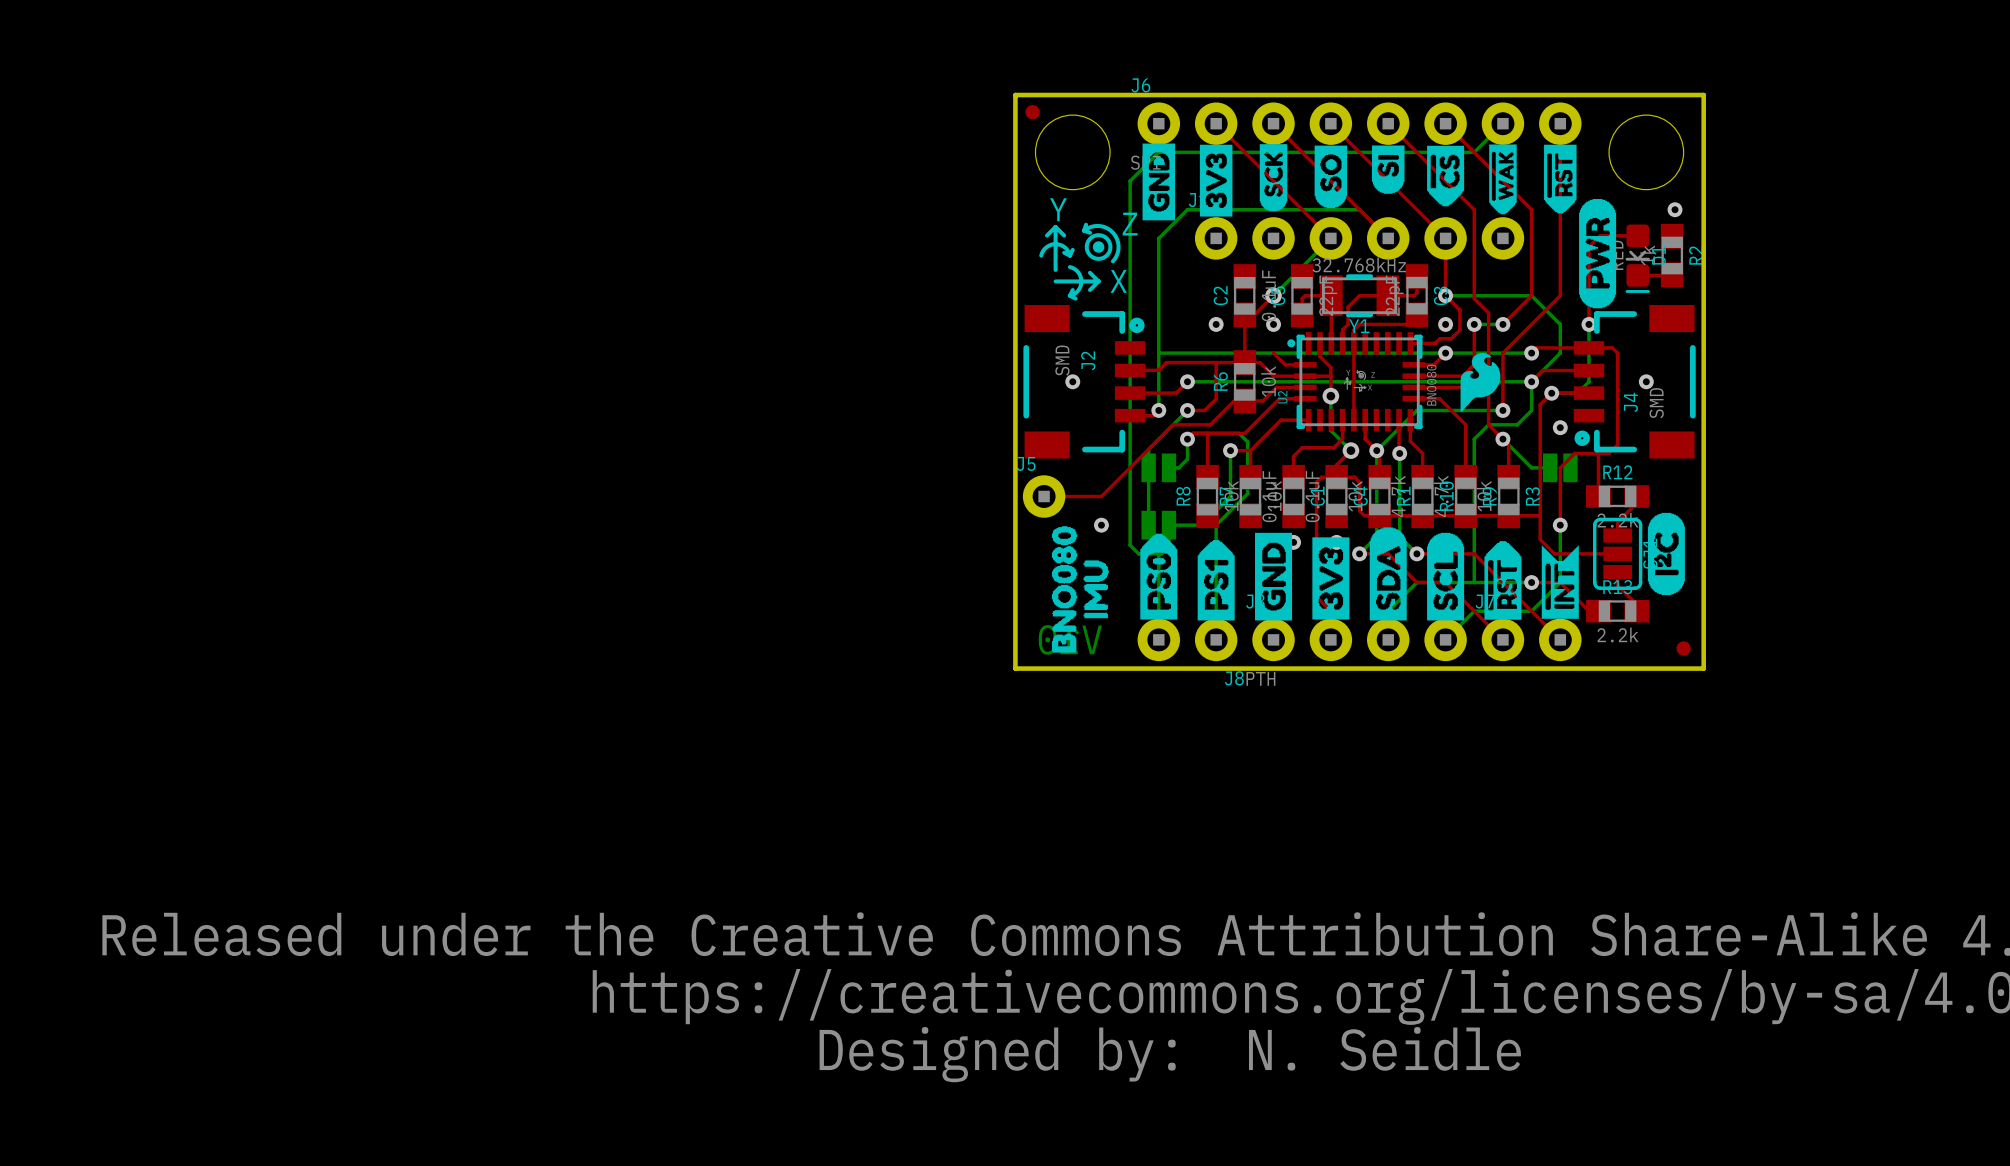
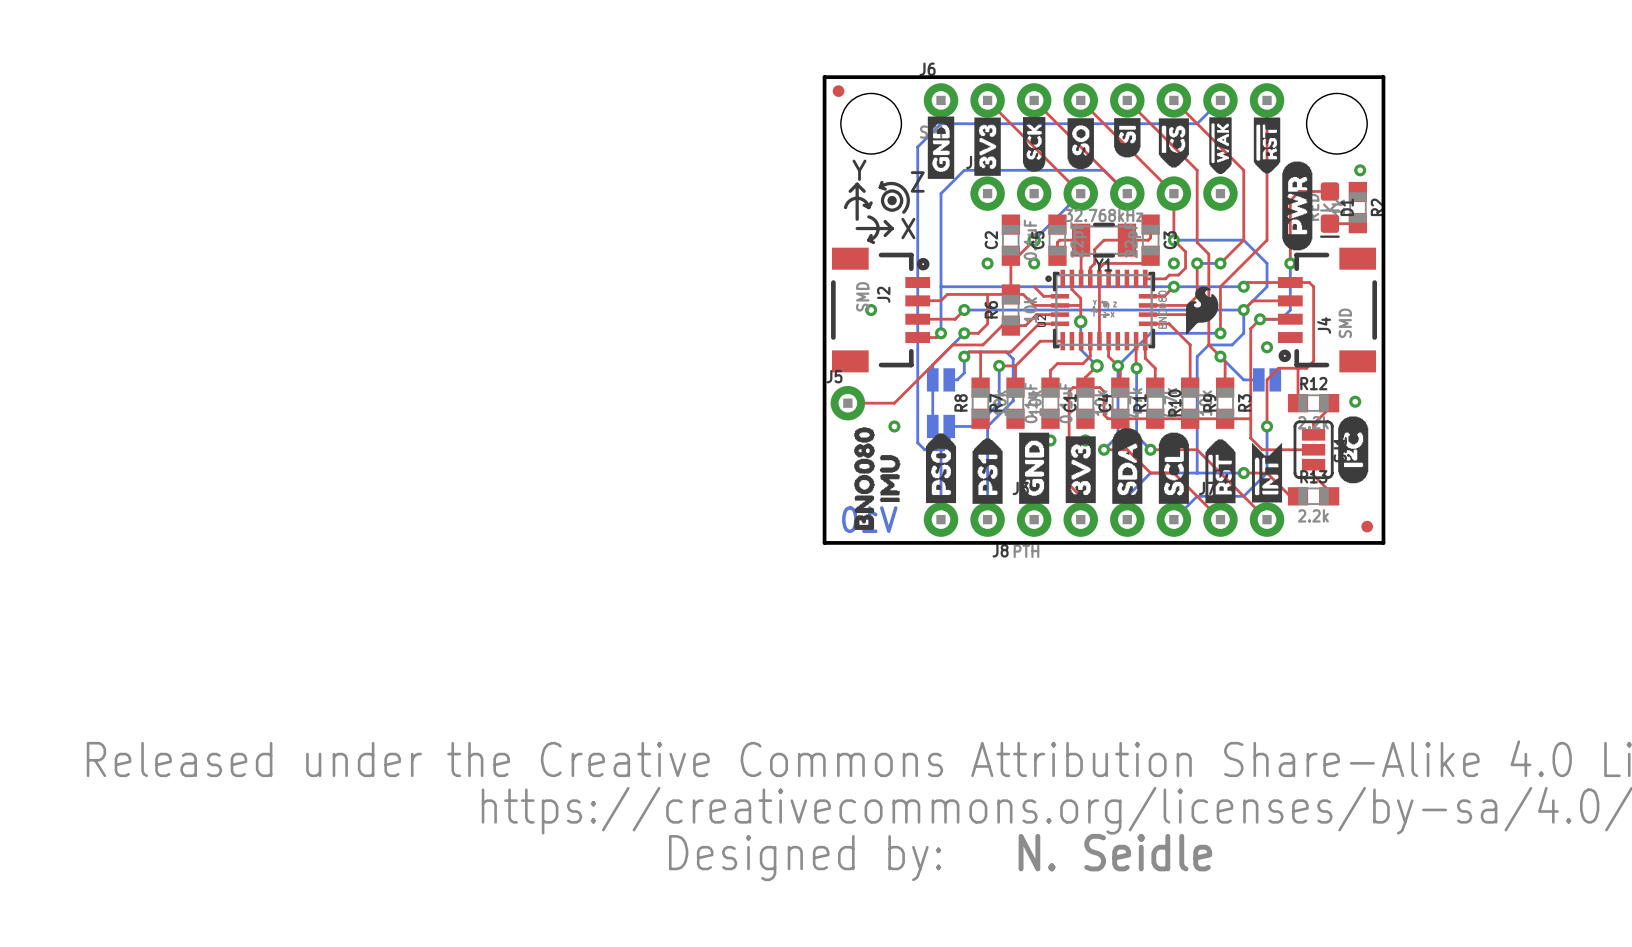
via position: (1646, 381) -> (1355, 401)

